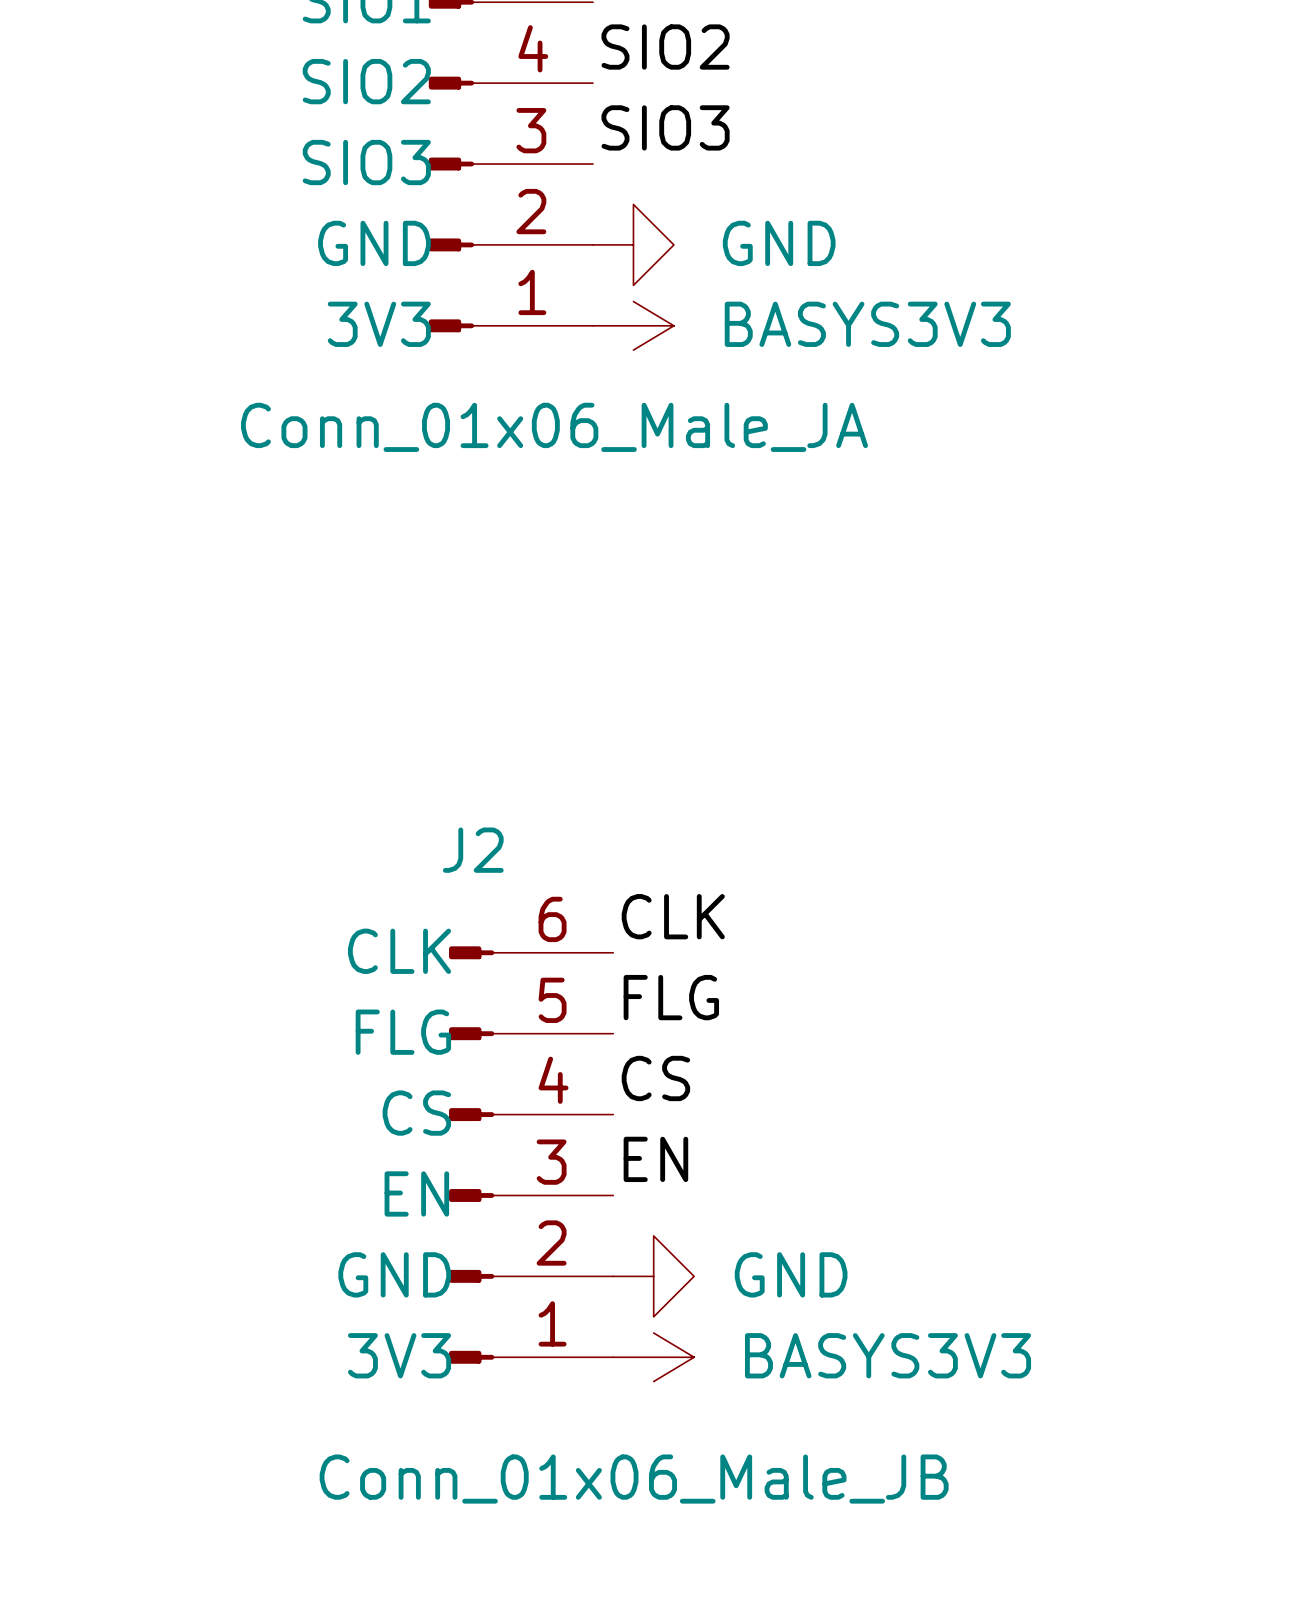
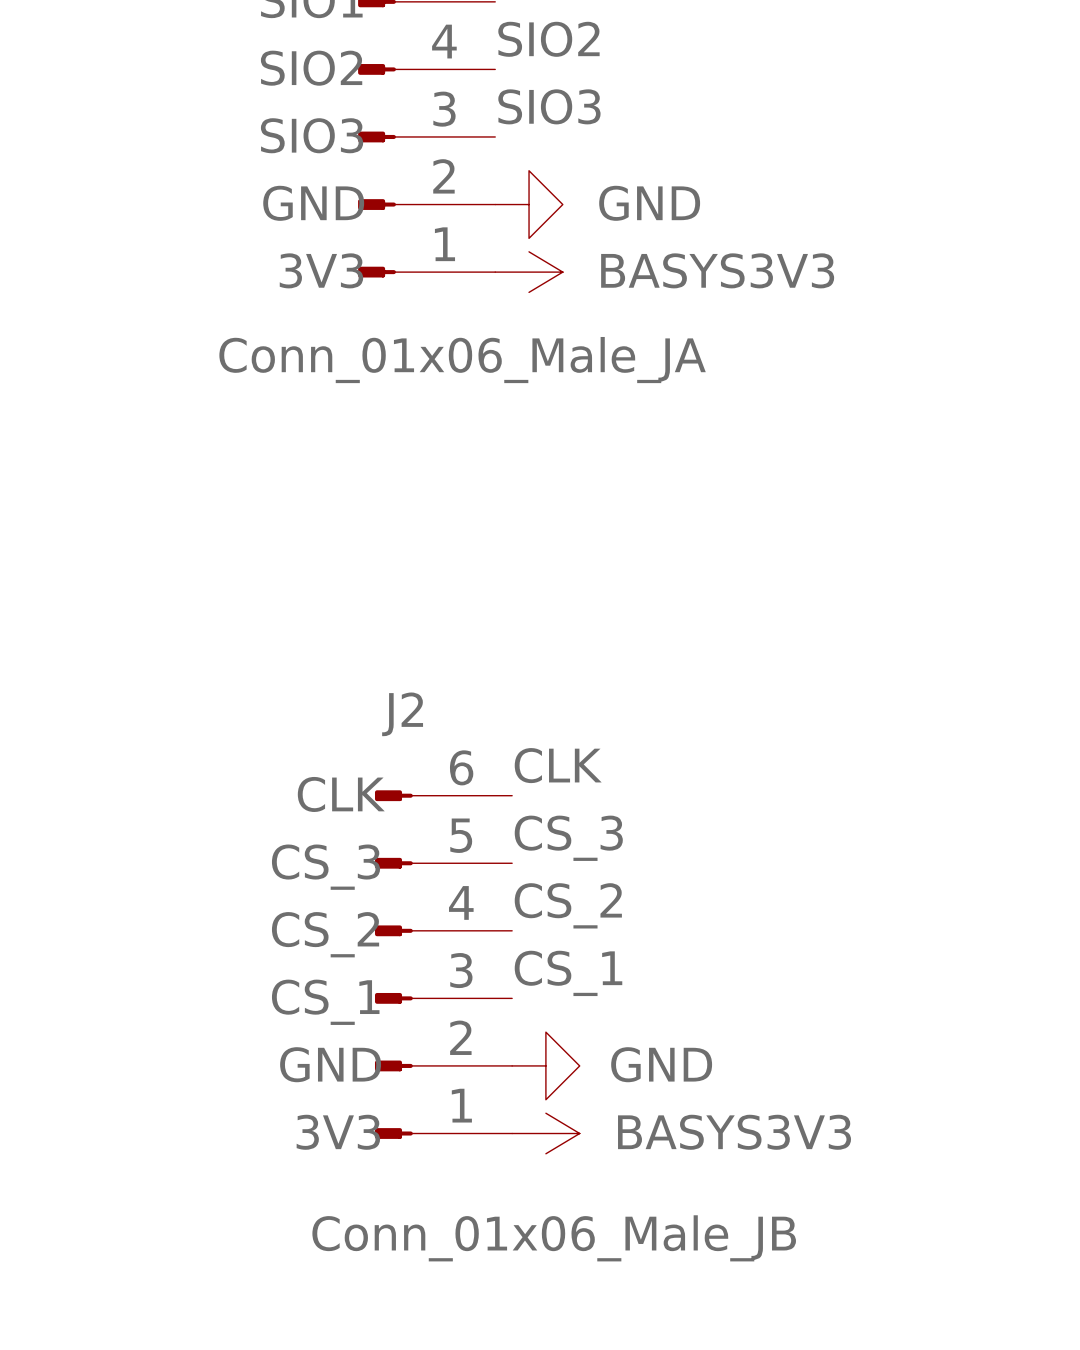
label: FLG (671, 997) -> CS_3 (568, 838)
J2 pin name: FLG (403, 1032) -> CS_3 (326, 867)
label: CS (655, 1078) -> CS_2 (568, 905)
J2 pin name: CS (416, 1113) -> CS_2 (325, 934)
label: EN (655, 1159) -> CS_1 (568, 973)
J2 pin name: EN (416, 1193) -> CS_1 (325, 1002)

